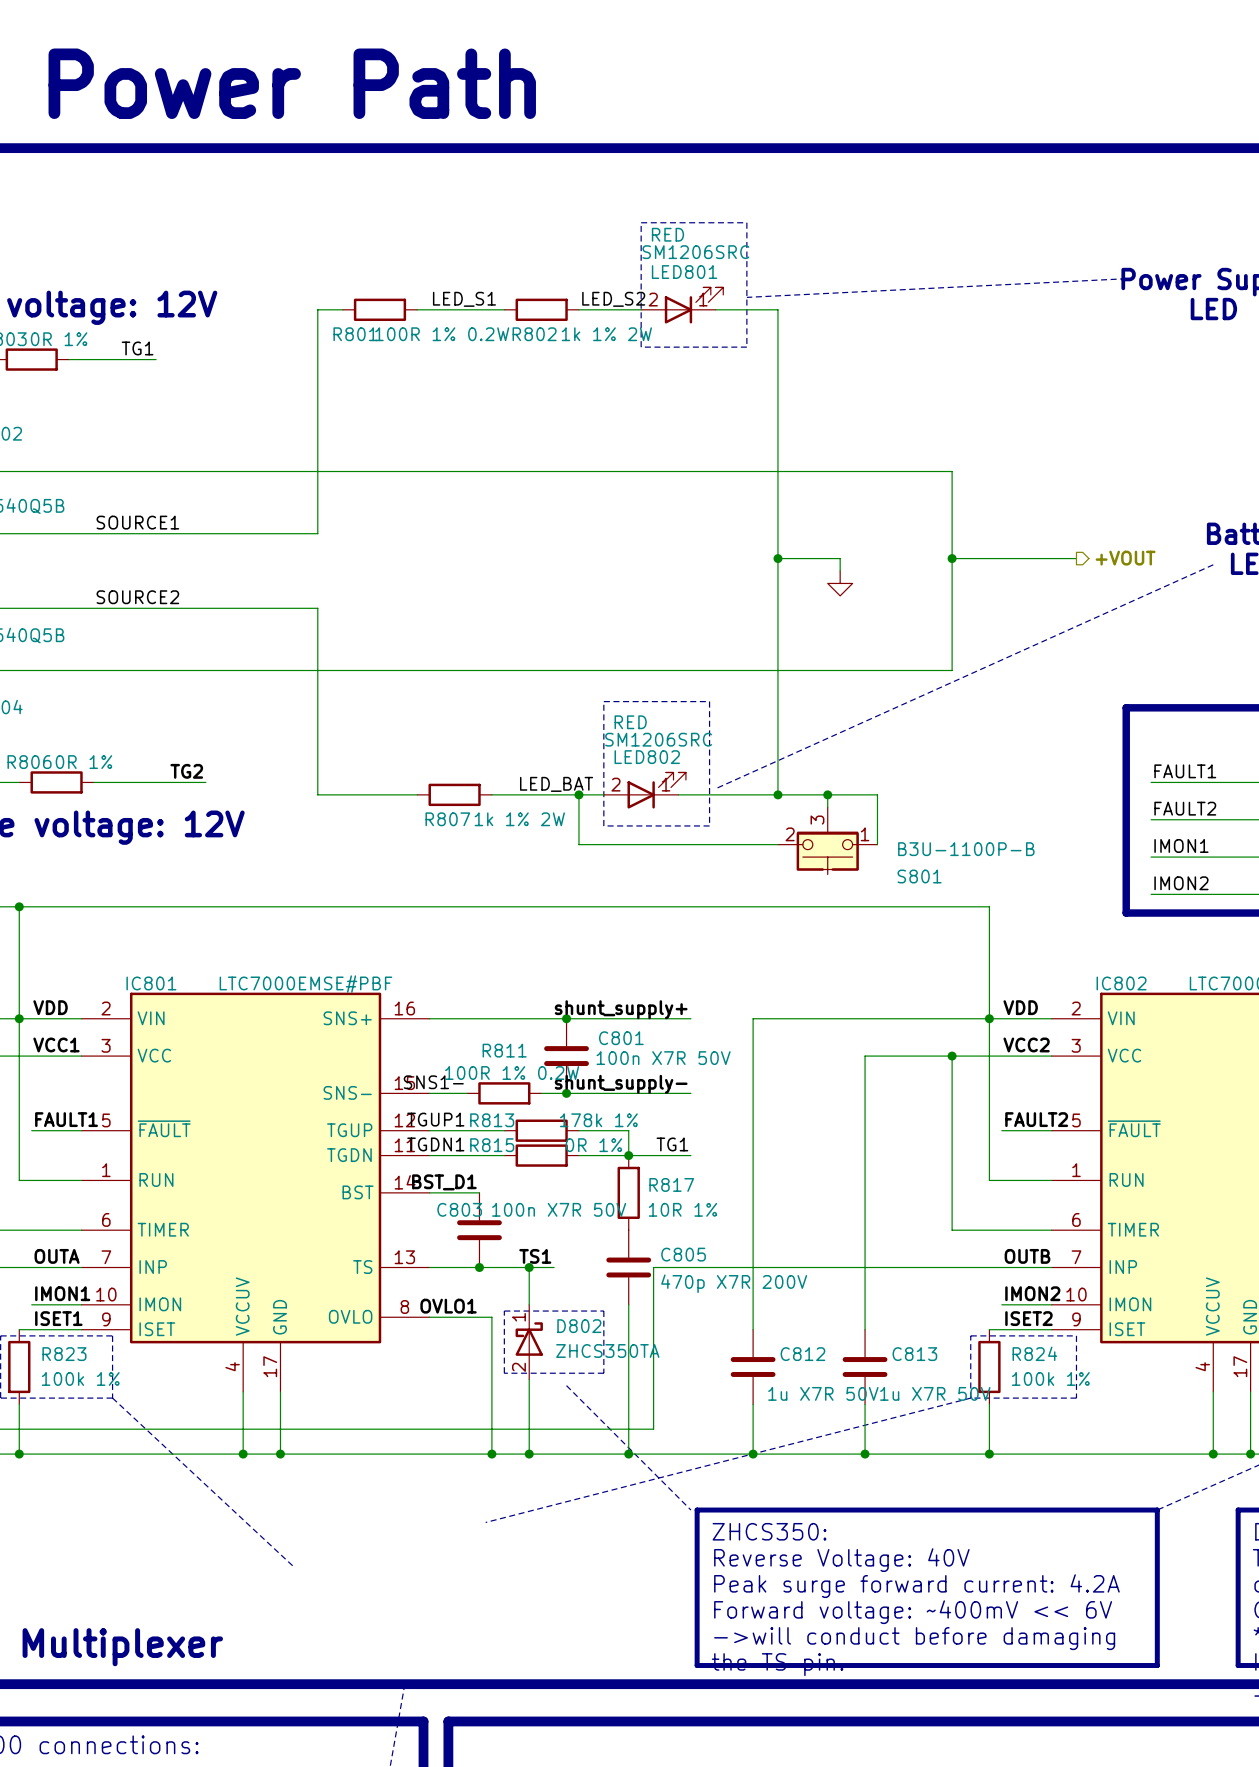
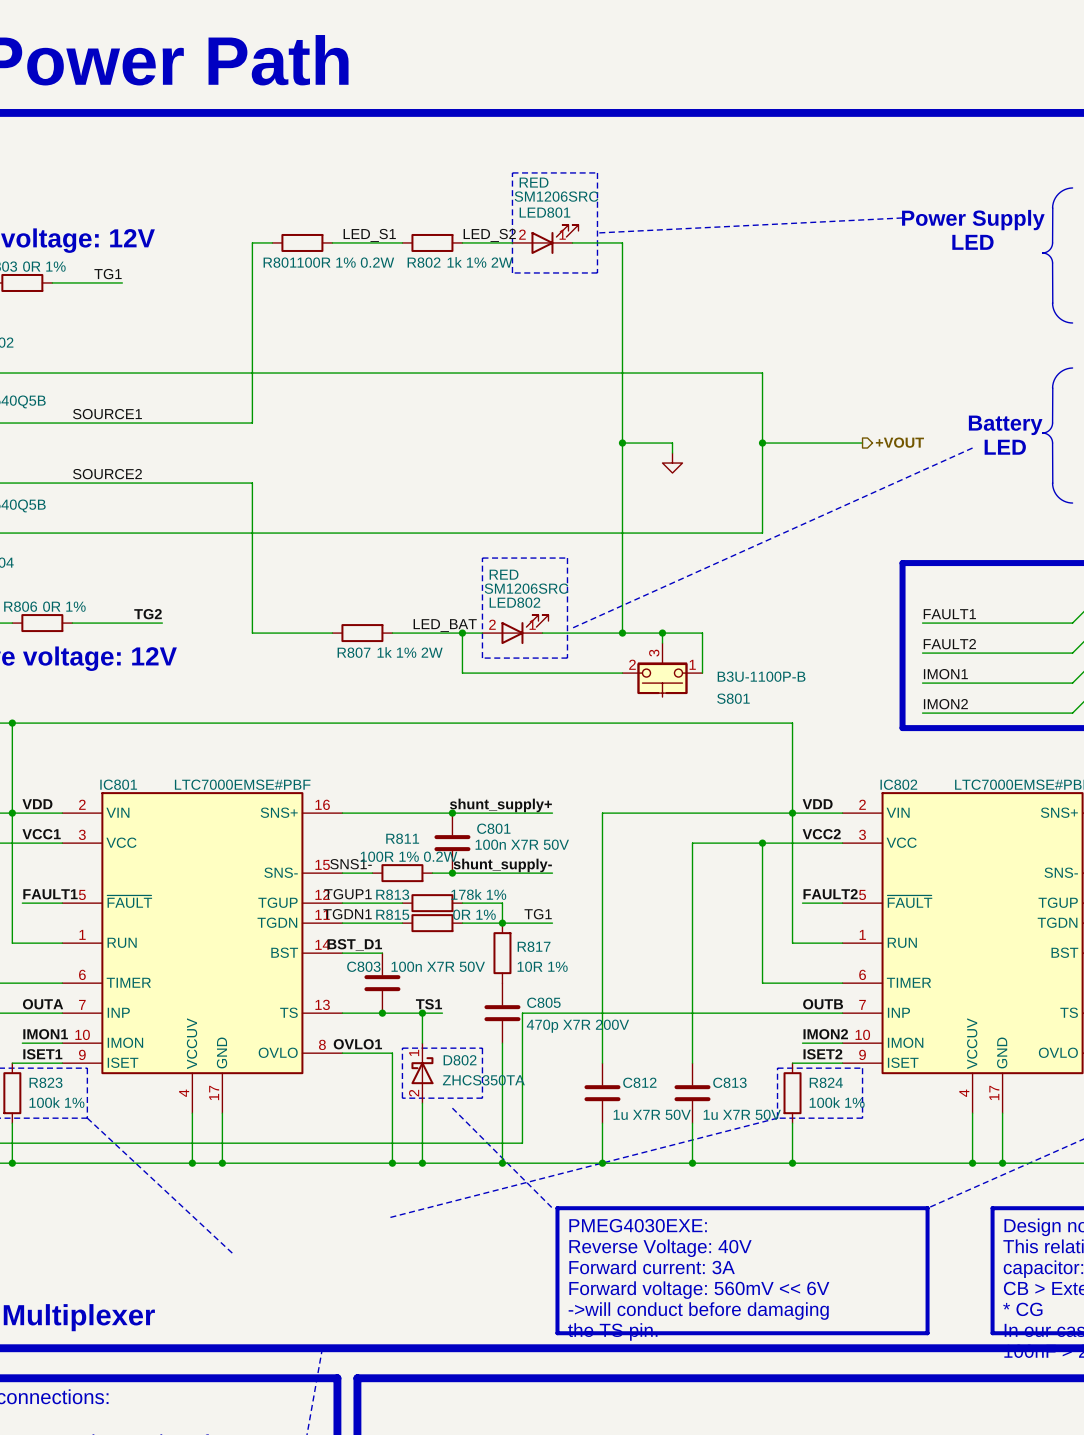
text: ZHCS350: (769, 1531) -> PMEG4030EXE: (638, 1225)
text: Peak surge forward current: 4.2A (916, 1586) -> Forward current: 3A (652, 1267)
text: Forward voltage: ~400mV << 6V (913, 1612) -> Forward voltage: 560mV << 6V (699, 1290)

